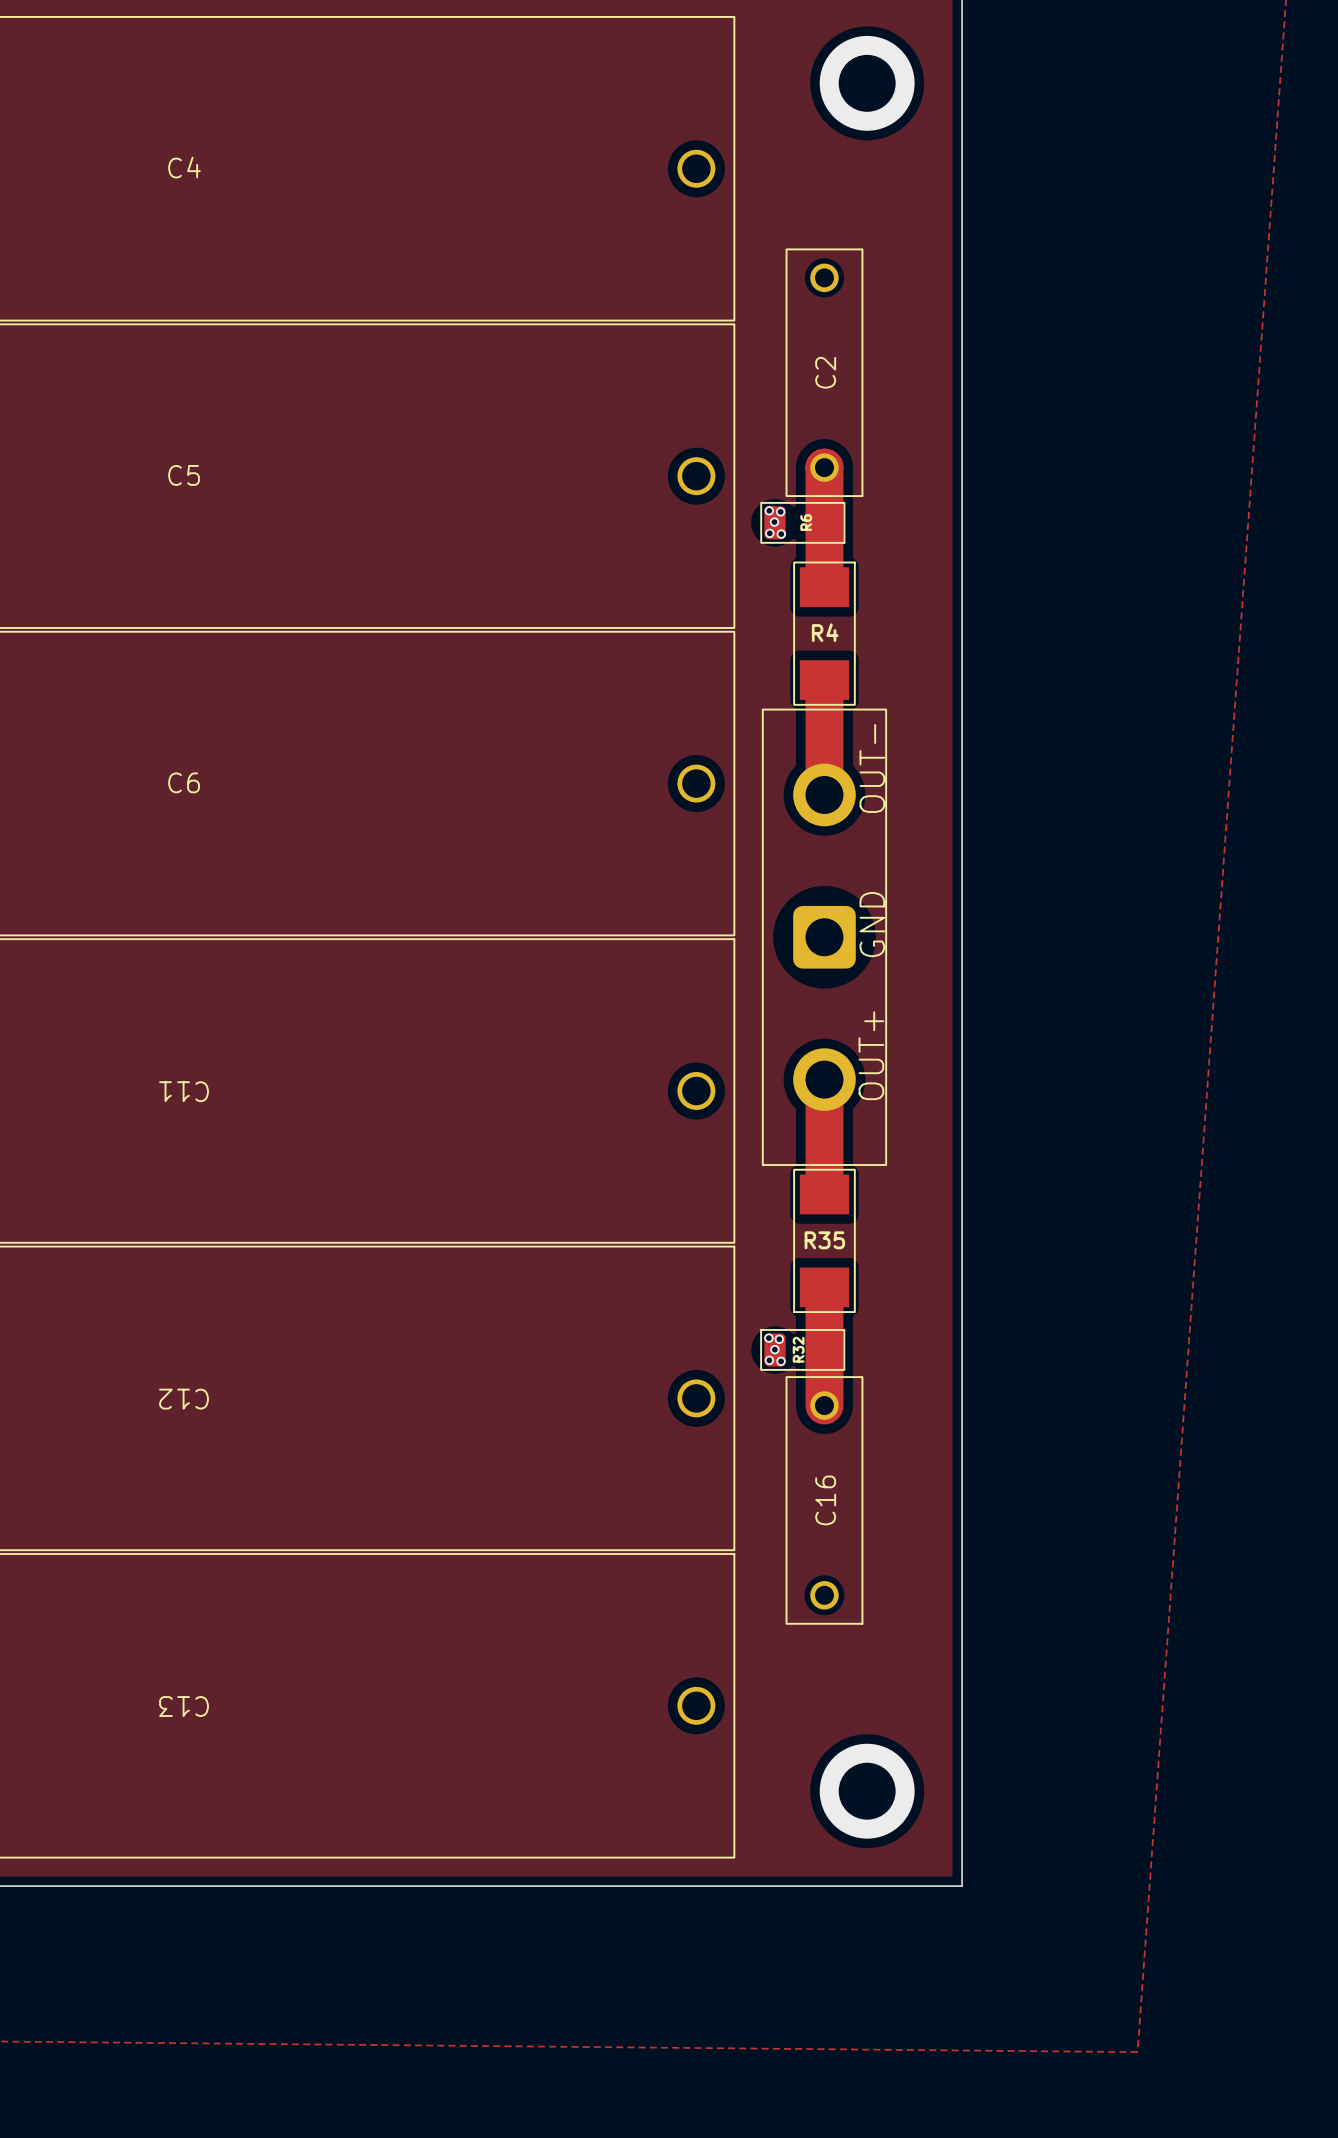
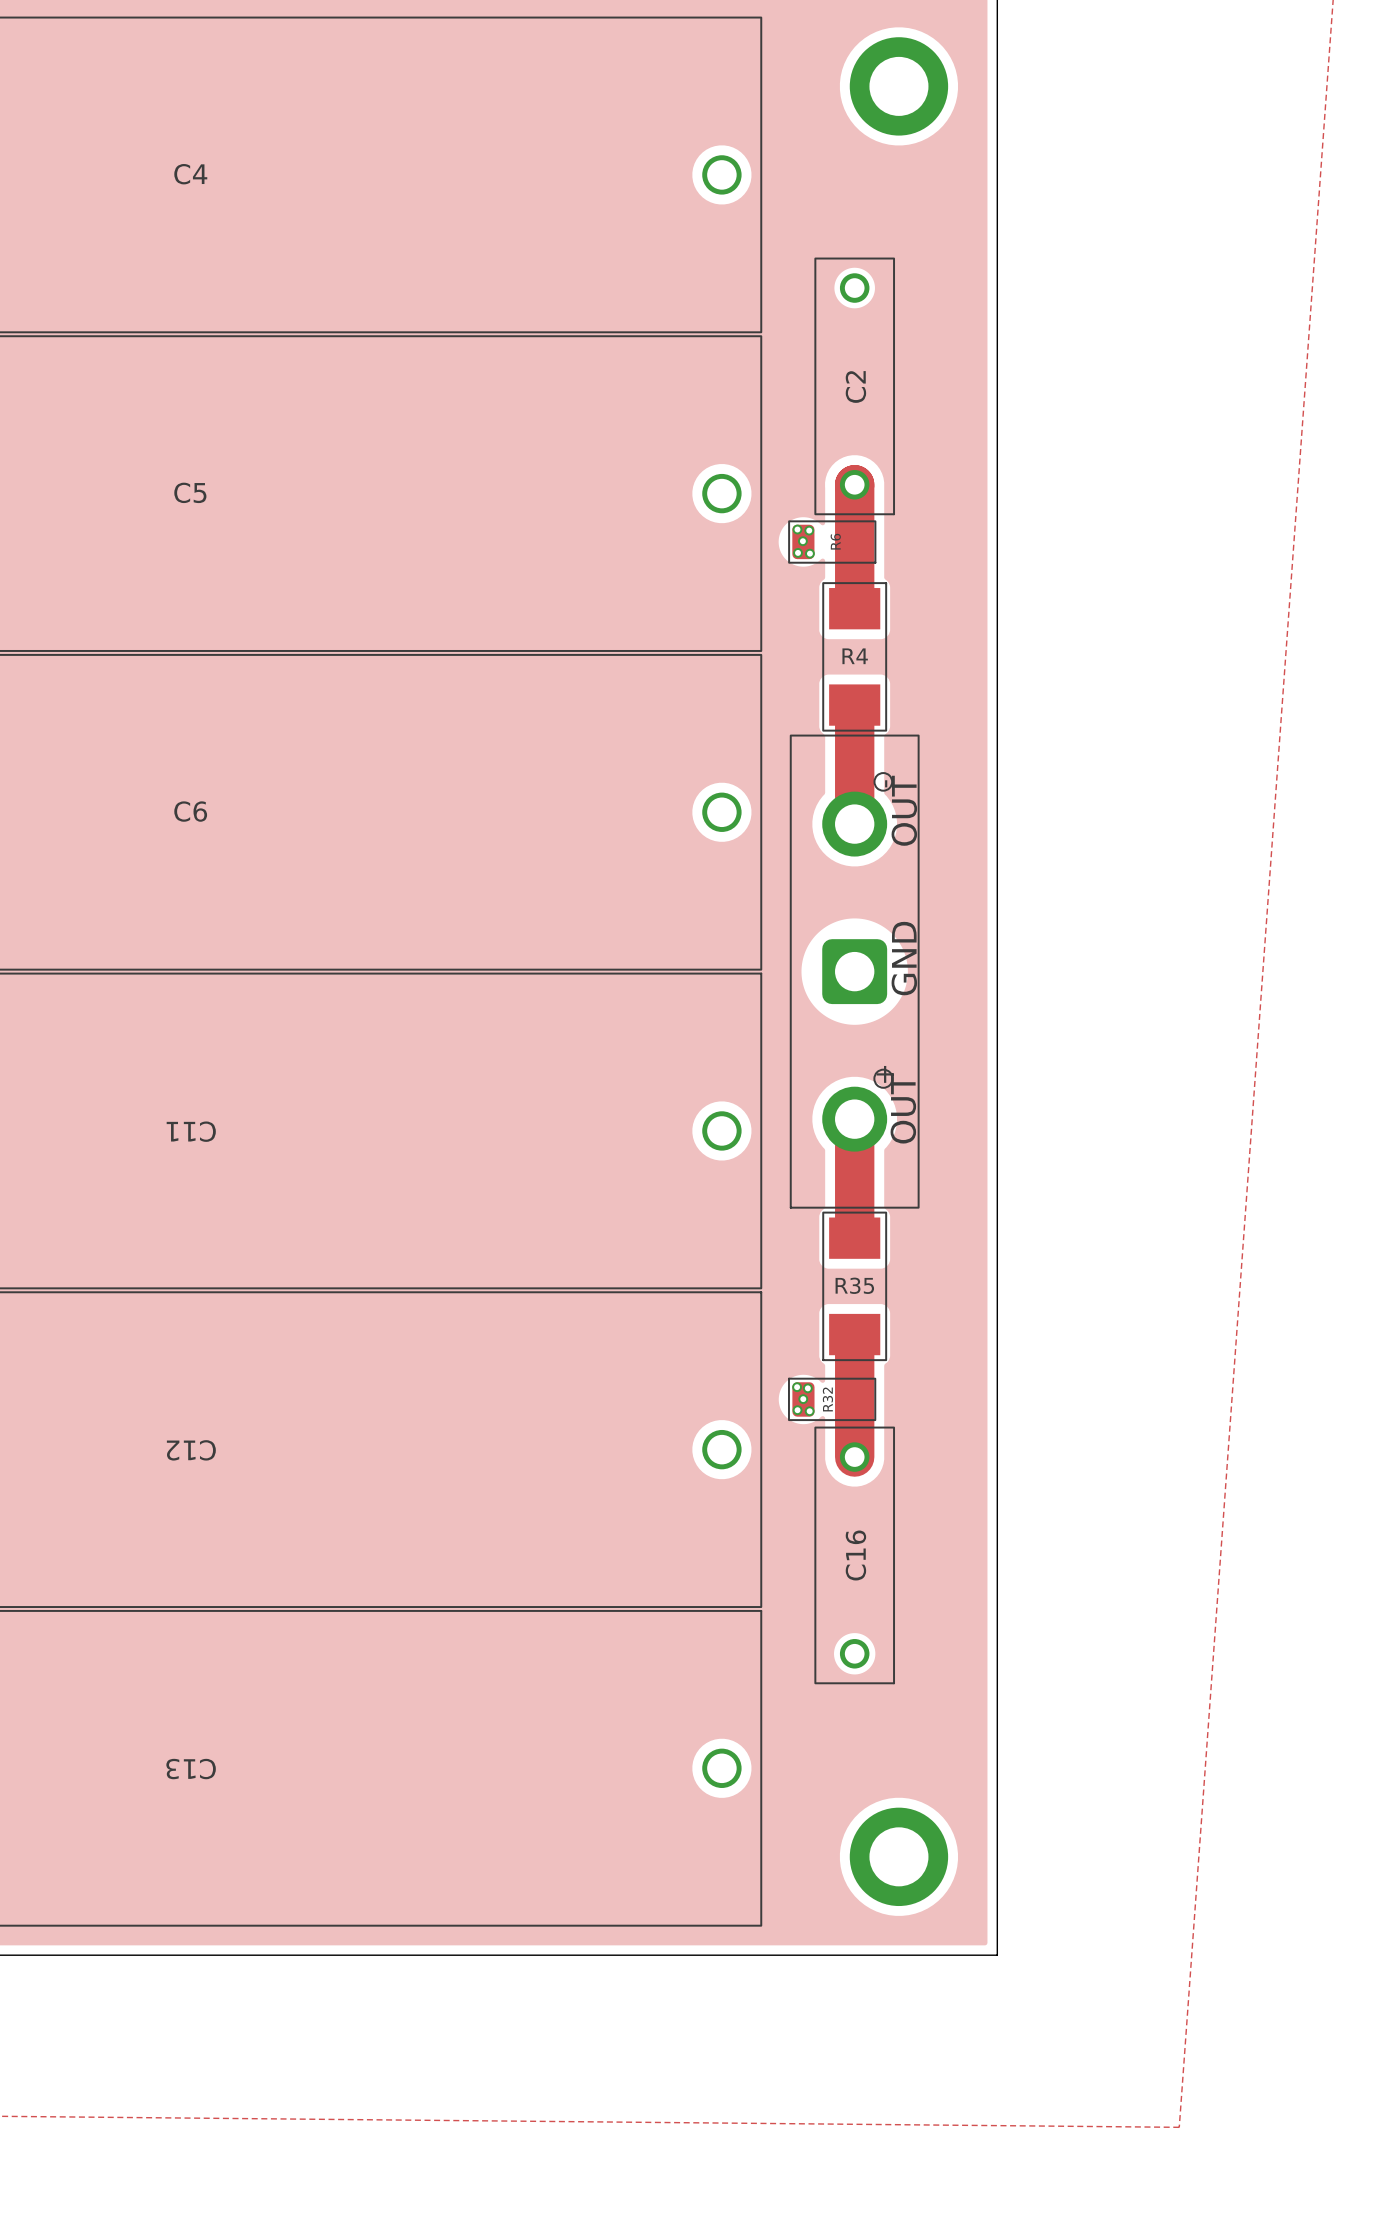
part footprint: [761, 708, 888, 1166] -> [789, 734, 920, 1209]

